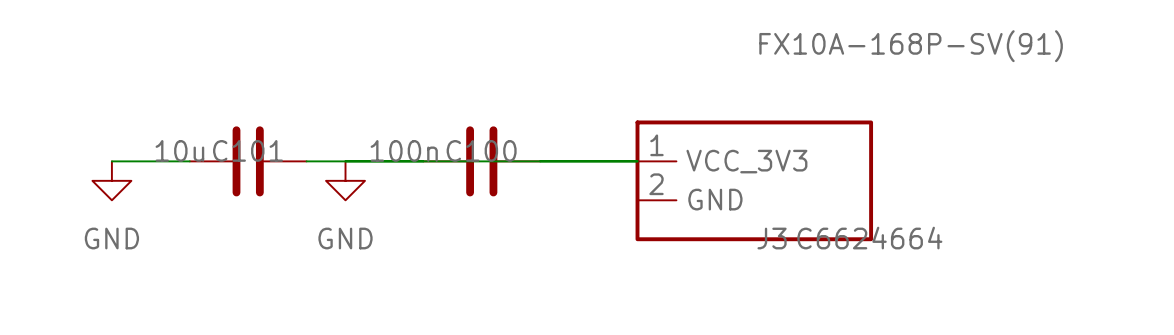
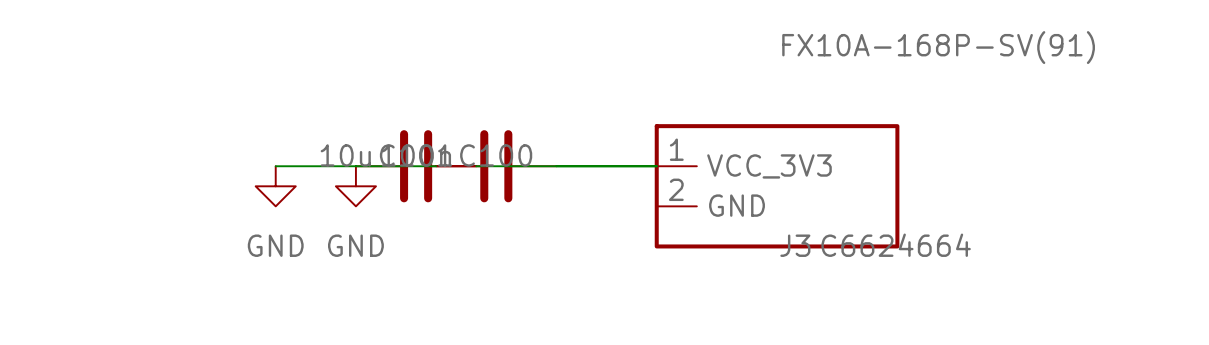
wire: (111, 161) (189, 161) -> none
C101 position: (248, 161) -> (416, 166)
power symbol position: GND (111, 180) -> GND (275, 186)

